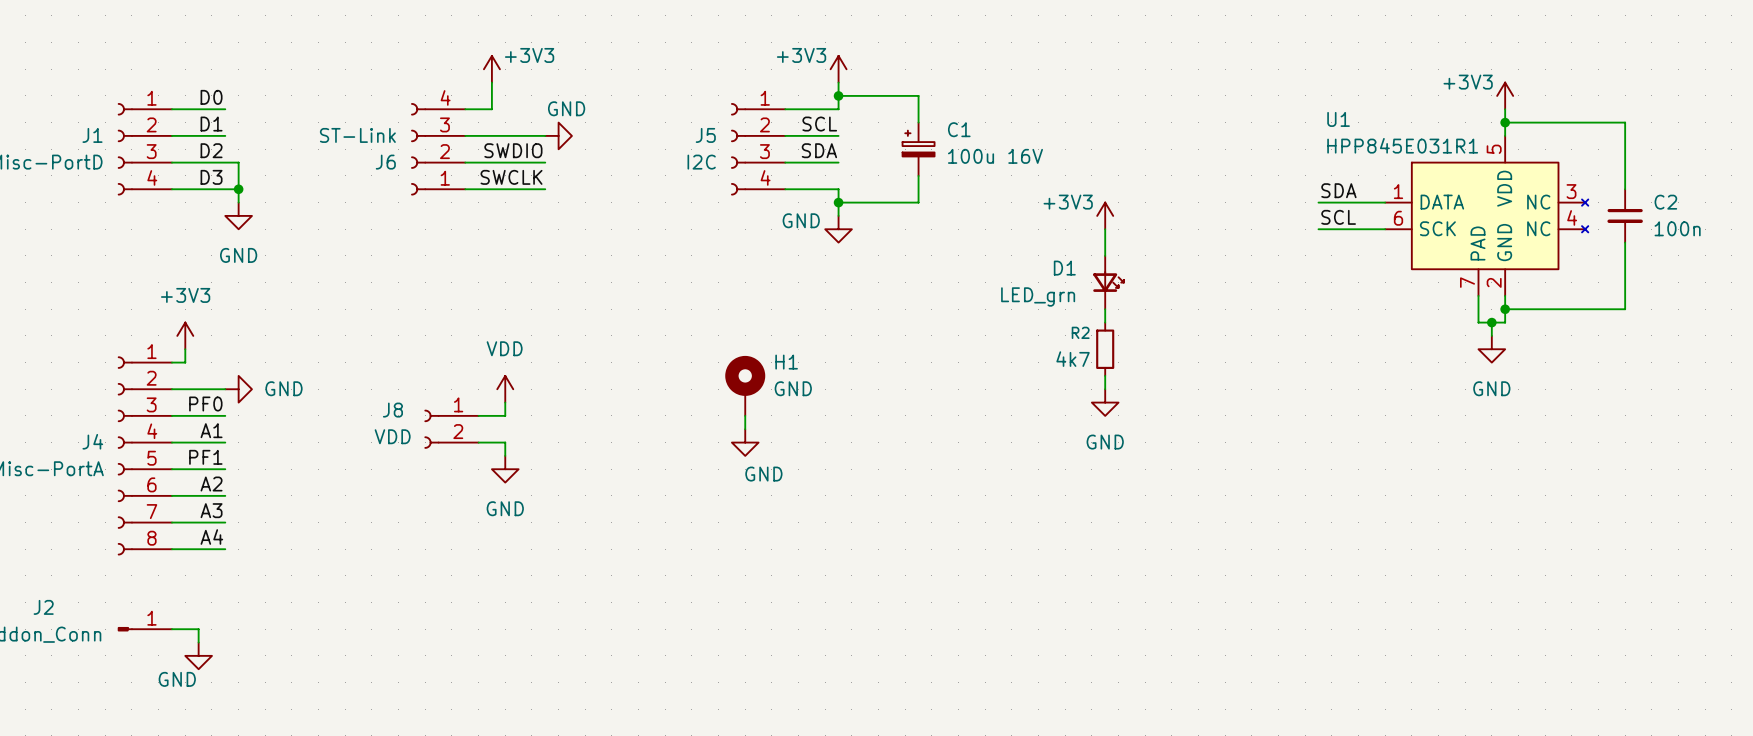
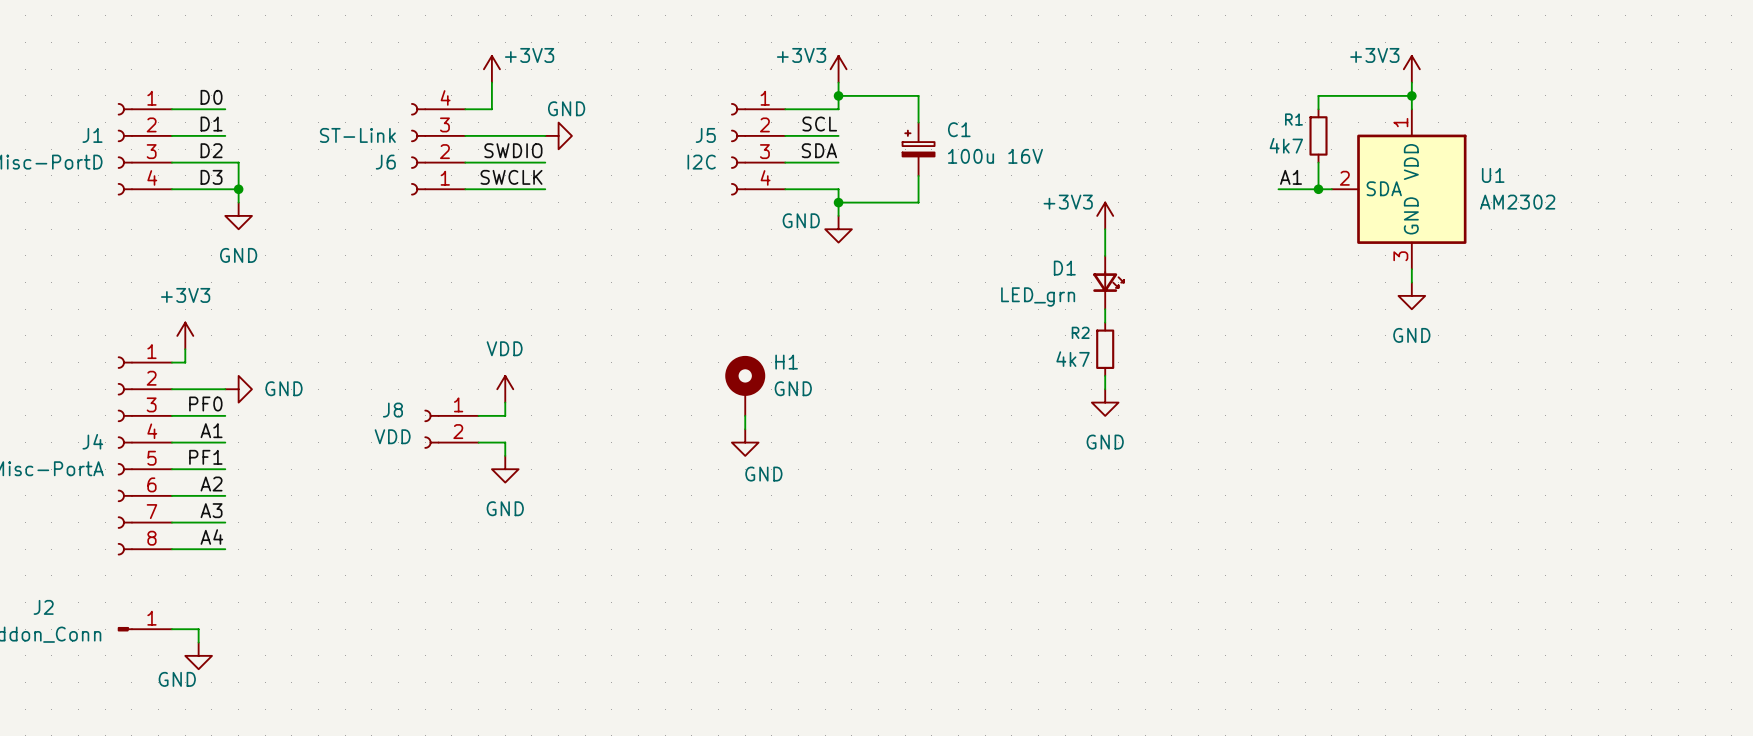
wire: none -> (1411, 95) (1318, 95) (1318, 109)
junction: none -> (1411, 95)
power symbol position: +3V3 (1505, 95) -> +3V3 (1411, 69)
wire: (1505, 109) (1505, 135) -> (1411, 82) (1411, 109)
U1 name position: U1 (1338, 119) -> U1 (1493, 175)
wire: (1505, 122) (1625, 122) (1625, 189) -> none
junction: (1505, 122) -> none
R1: none -> 4k7 (1318, 135)
U1 symbol: [1385, 135, 1589, 296] -> [1331, 109, 1467, 270]
U1 value: HPP845E031R1 (1402, 145) -> AM2302 (1517, 202)
wire: none -> (1318, 162) (1318, 189)
label: none -> A1 (1290, 177)
wire: none -> (1278, 189) (1331, 189)
junction: none -> (1318, 189)
label: SDA (1338, 190) -> none
wire: (1318, 202) (1385, 202) -> none
C2: 100n (1625, 215) -> none
label: SCL (1338, 217) -> none
wire: (1318, 229) (1385, 229) -> none
wire: (1625, 242) (1625, 309) (1505, 309) -> none
wire: (1478, 295) (1478, 322) (1505, 322) (1505, 295) -> none
junction: (1505, 309) -> none
wire: (1491, 322) (1491, 335) -> (1411, 269) (1411, 282)
junction: (1491, 322) -> none
power symbol position: GND (1491, 349) -> GND (1411, 295)

